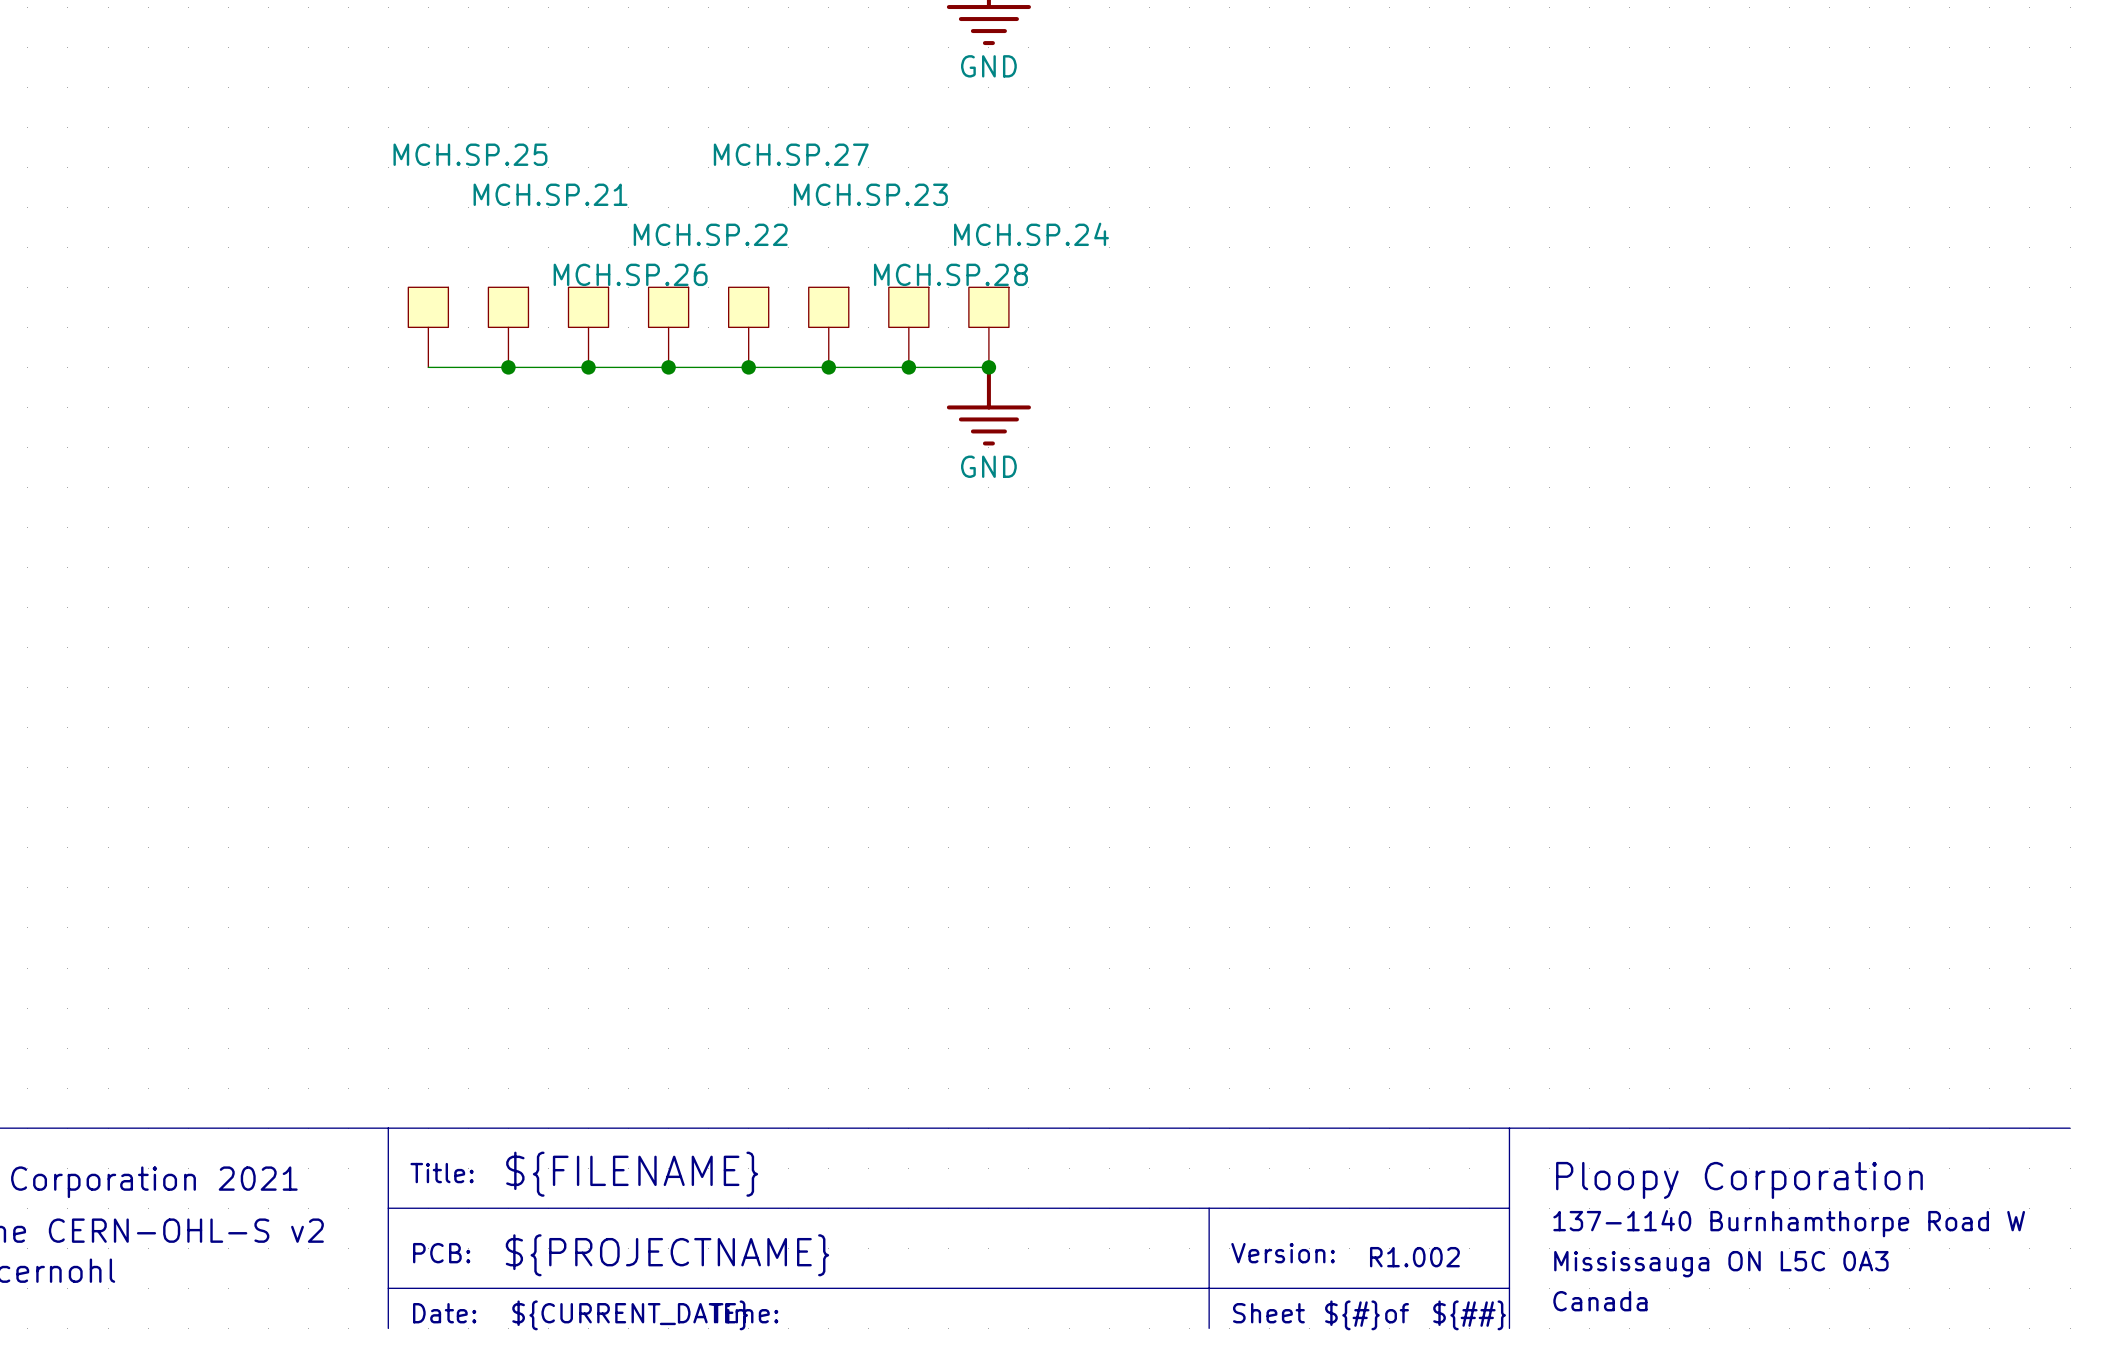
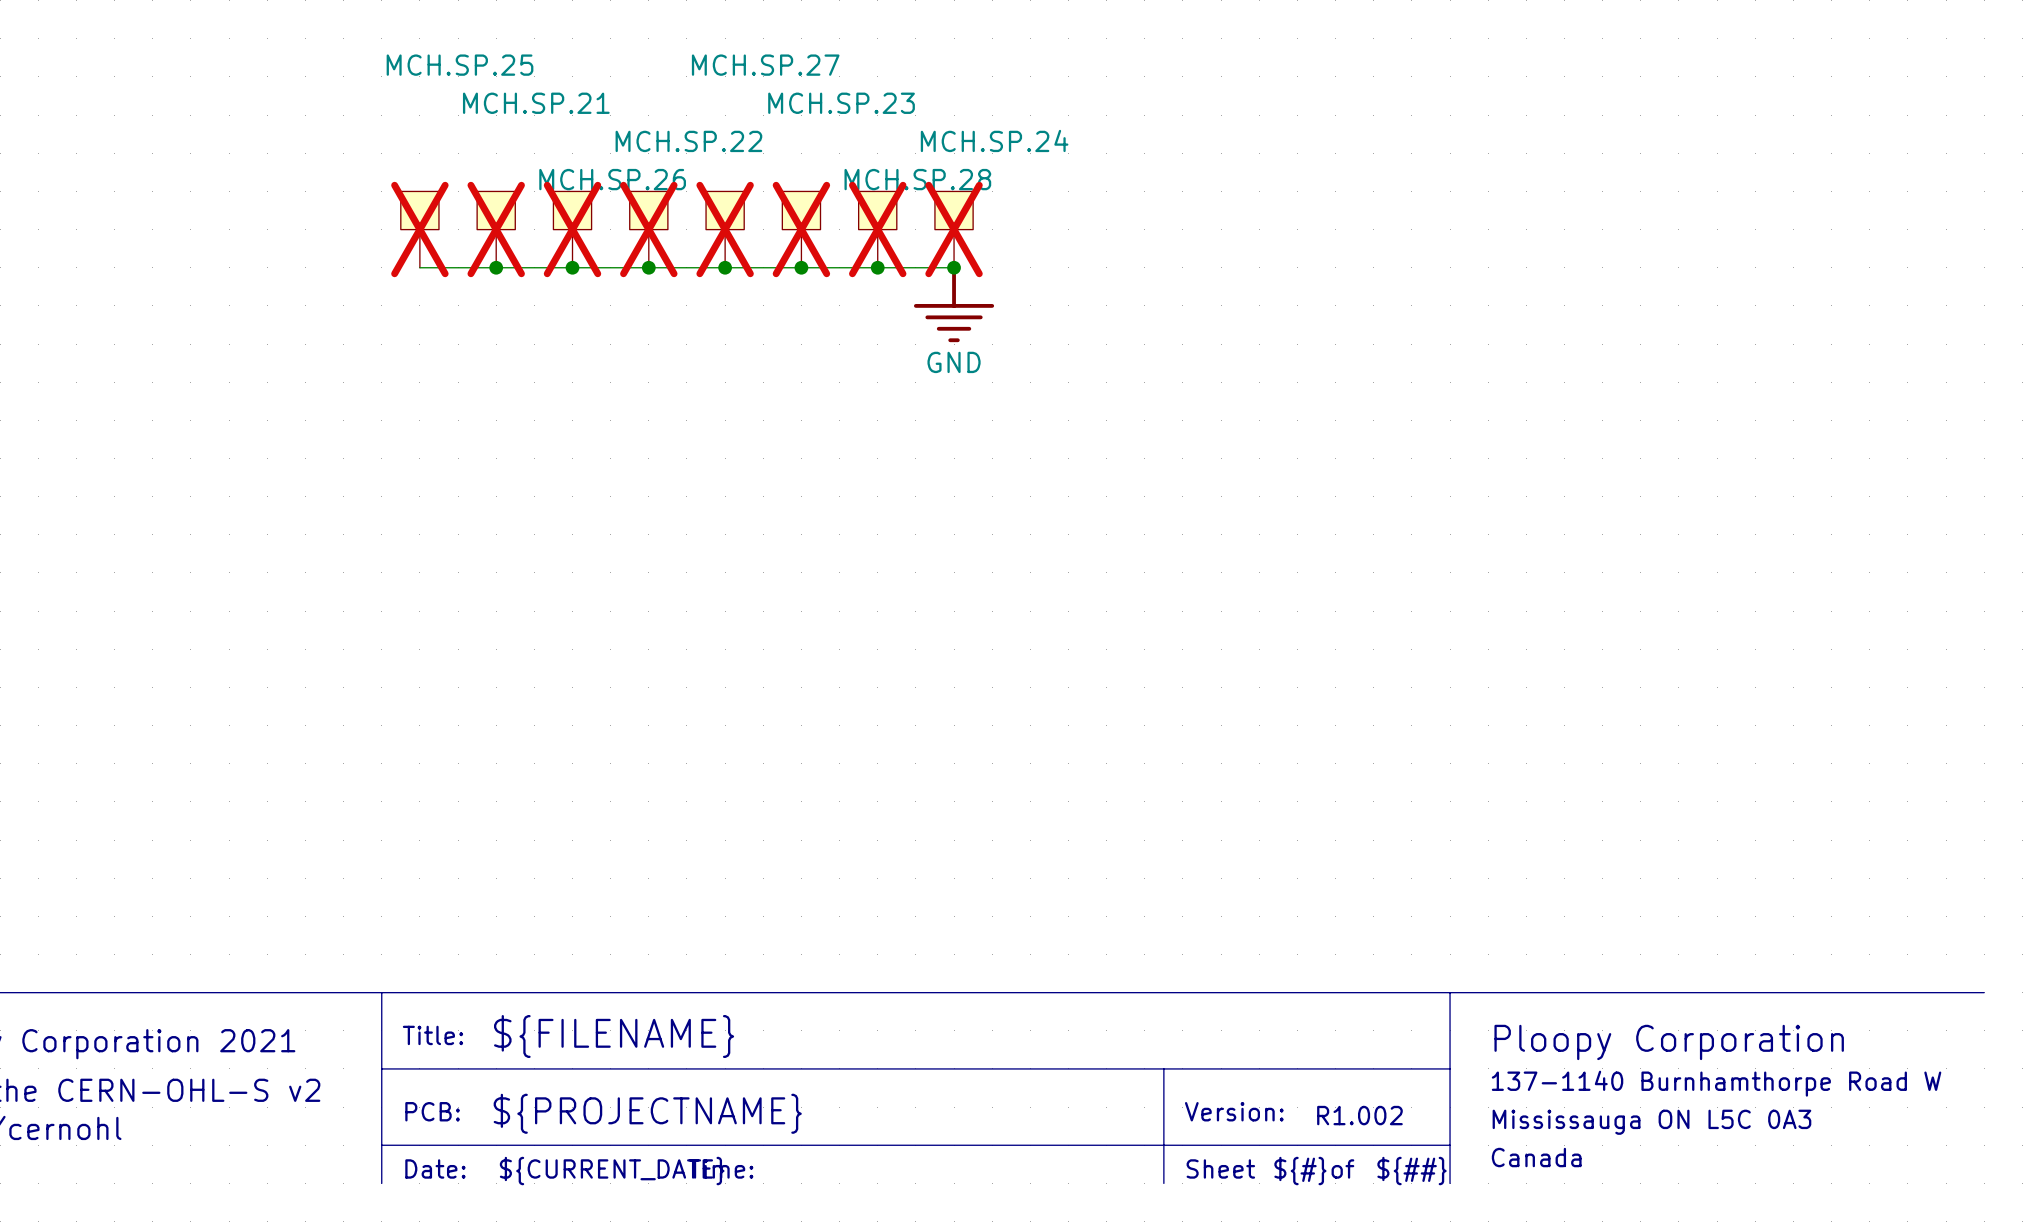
MCH.SP.25 do-not-place cross: none -> (419, 229)
MCH.SP.21 do-not-place cross: none -> (496, 229)
MCH.SP.26 do-not-place cross: none -> (572, 229)
MCH.SP.22 do-not-place cross: none -> (648, 229)
MCH.SP.27 do-not-place cross: none -> (725, 229)
MCH.SP.23 do-not-place cross: none -> (801, 229)
MCH.SP.28 do-not-place cross: none -> (877, 229)
MCH.SP.24 do-not-place cross: none -> (954, 229)

